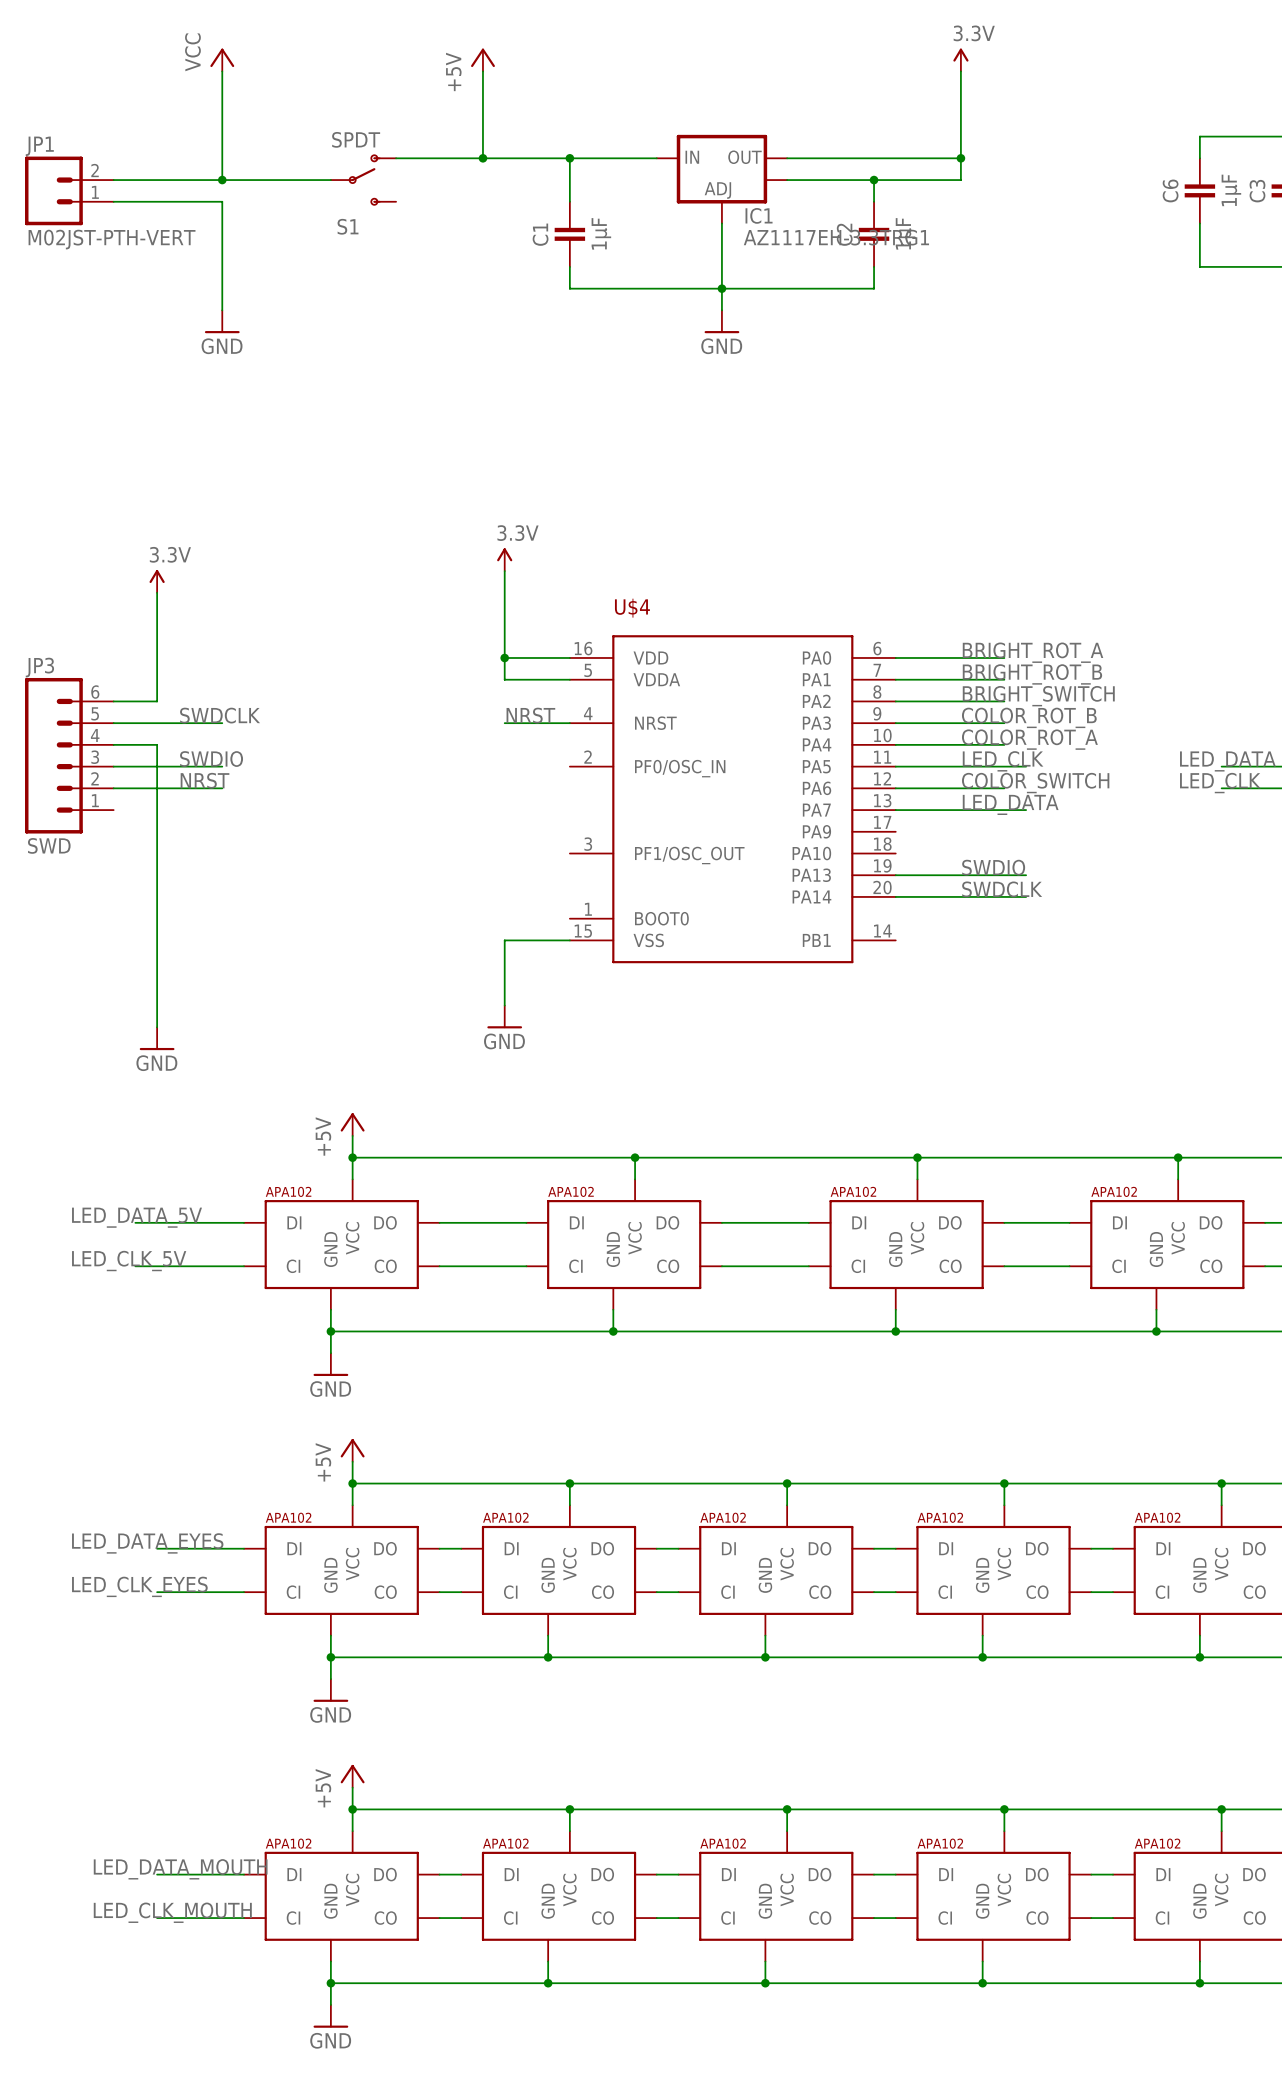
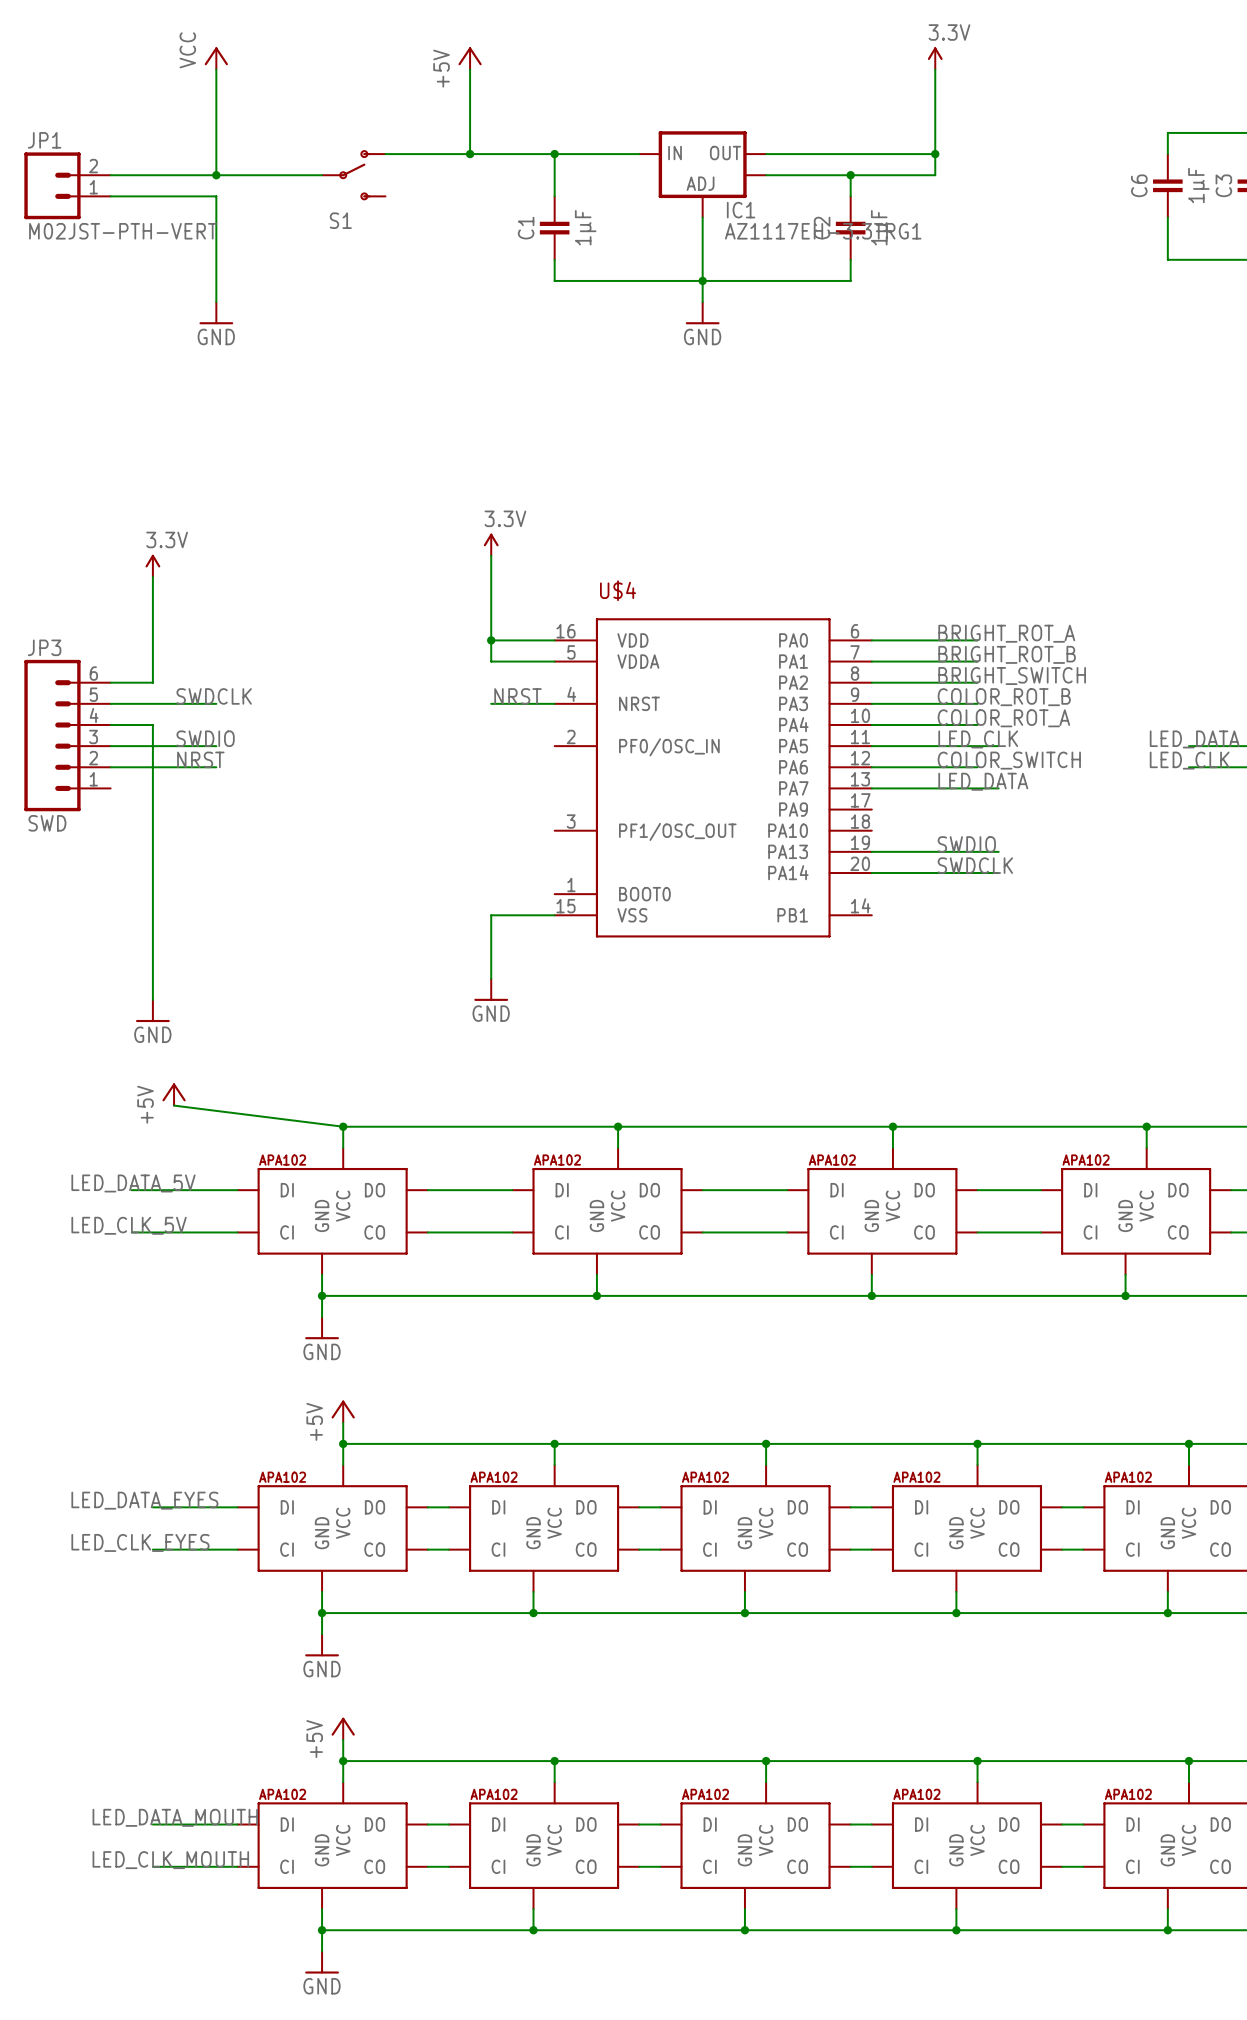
S1 value: SPDT (356, 139) -> none
power symbol position: +5V (352, 1124) -> +5V (174, 1094)
wire: (352, 1135) (352, 1157) -> (174, 1105) (343, 1126)

